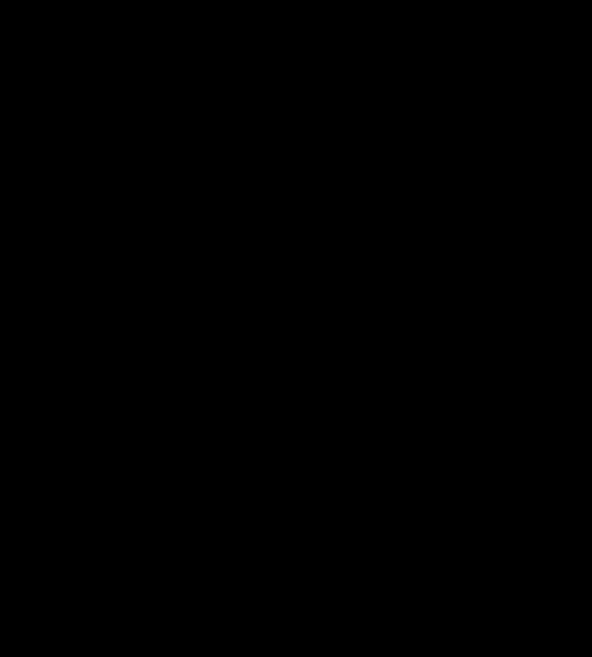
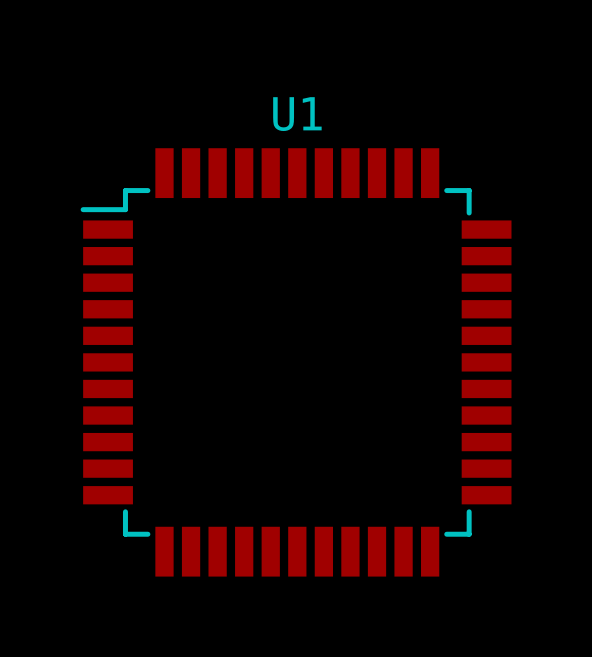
U1: none -> (296, 362)

